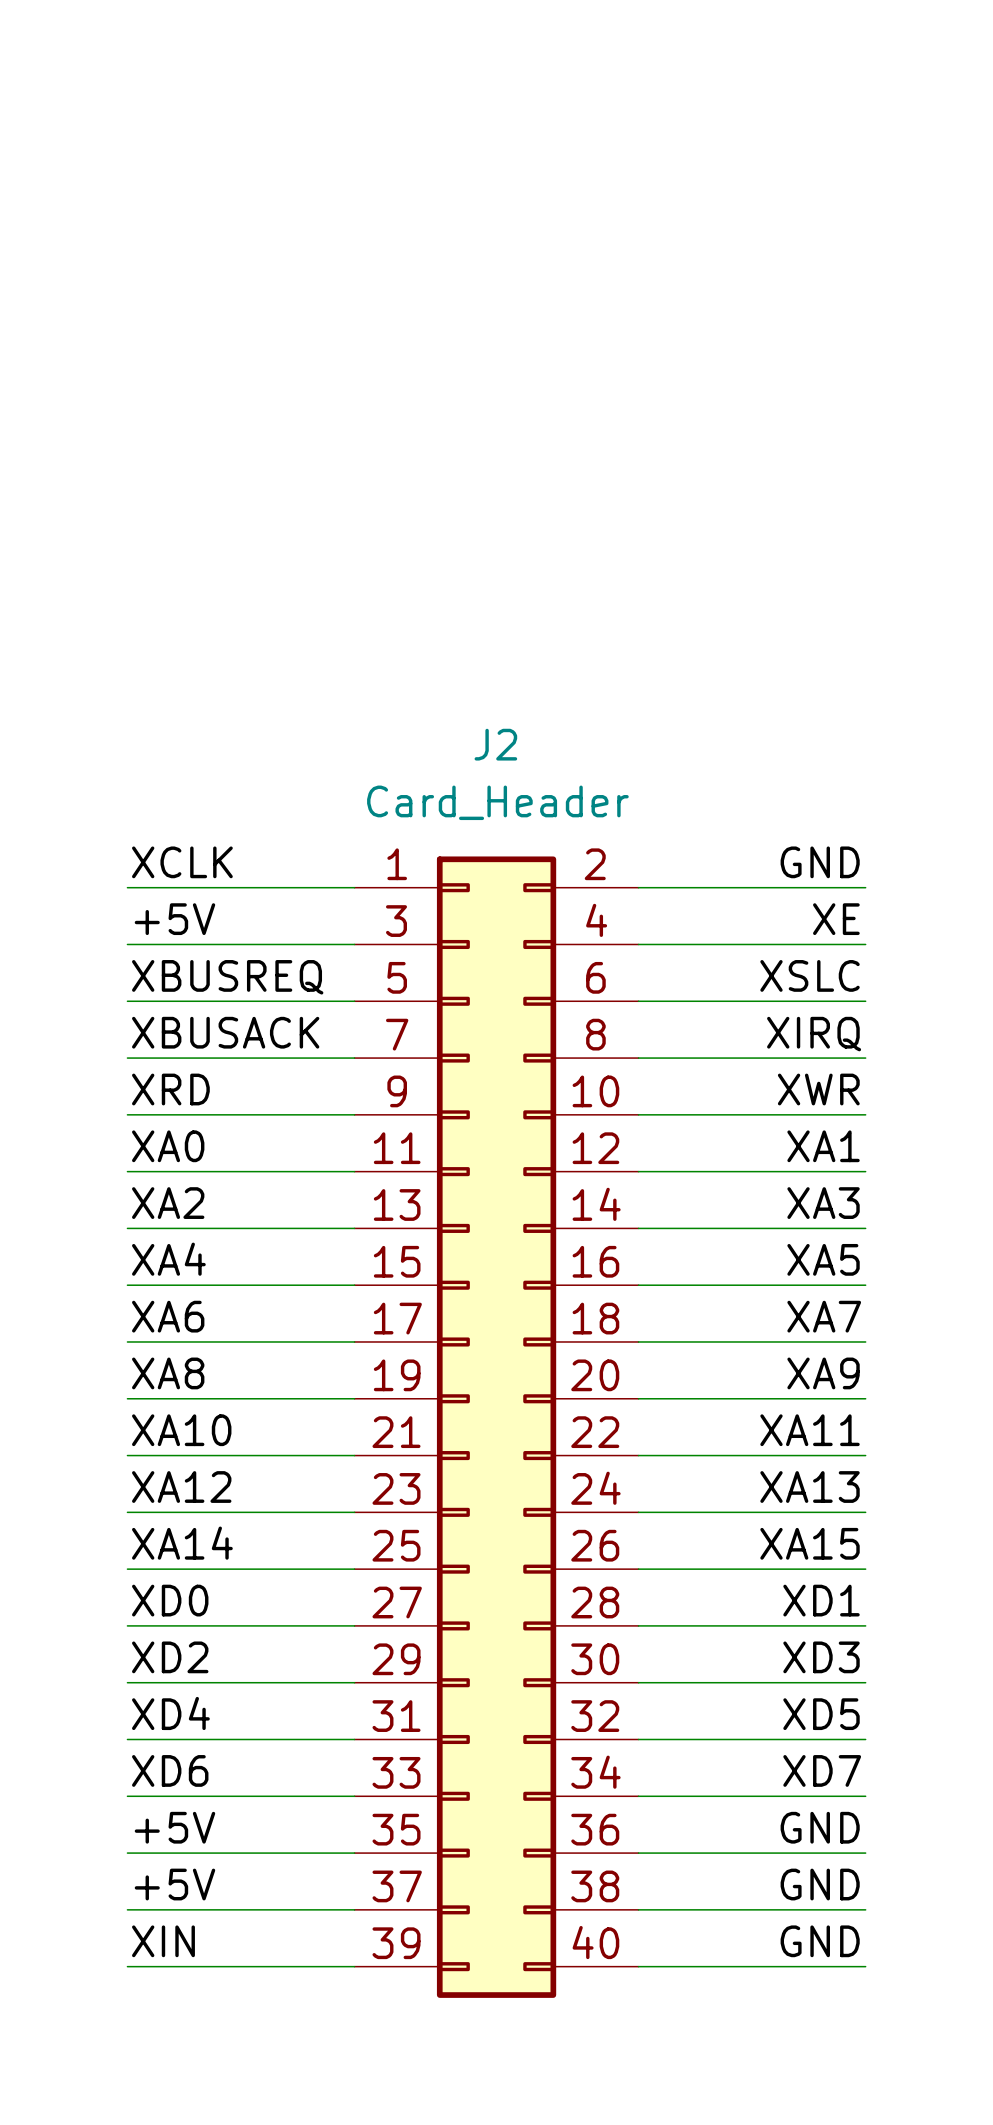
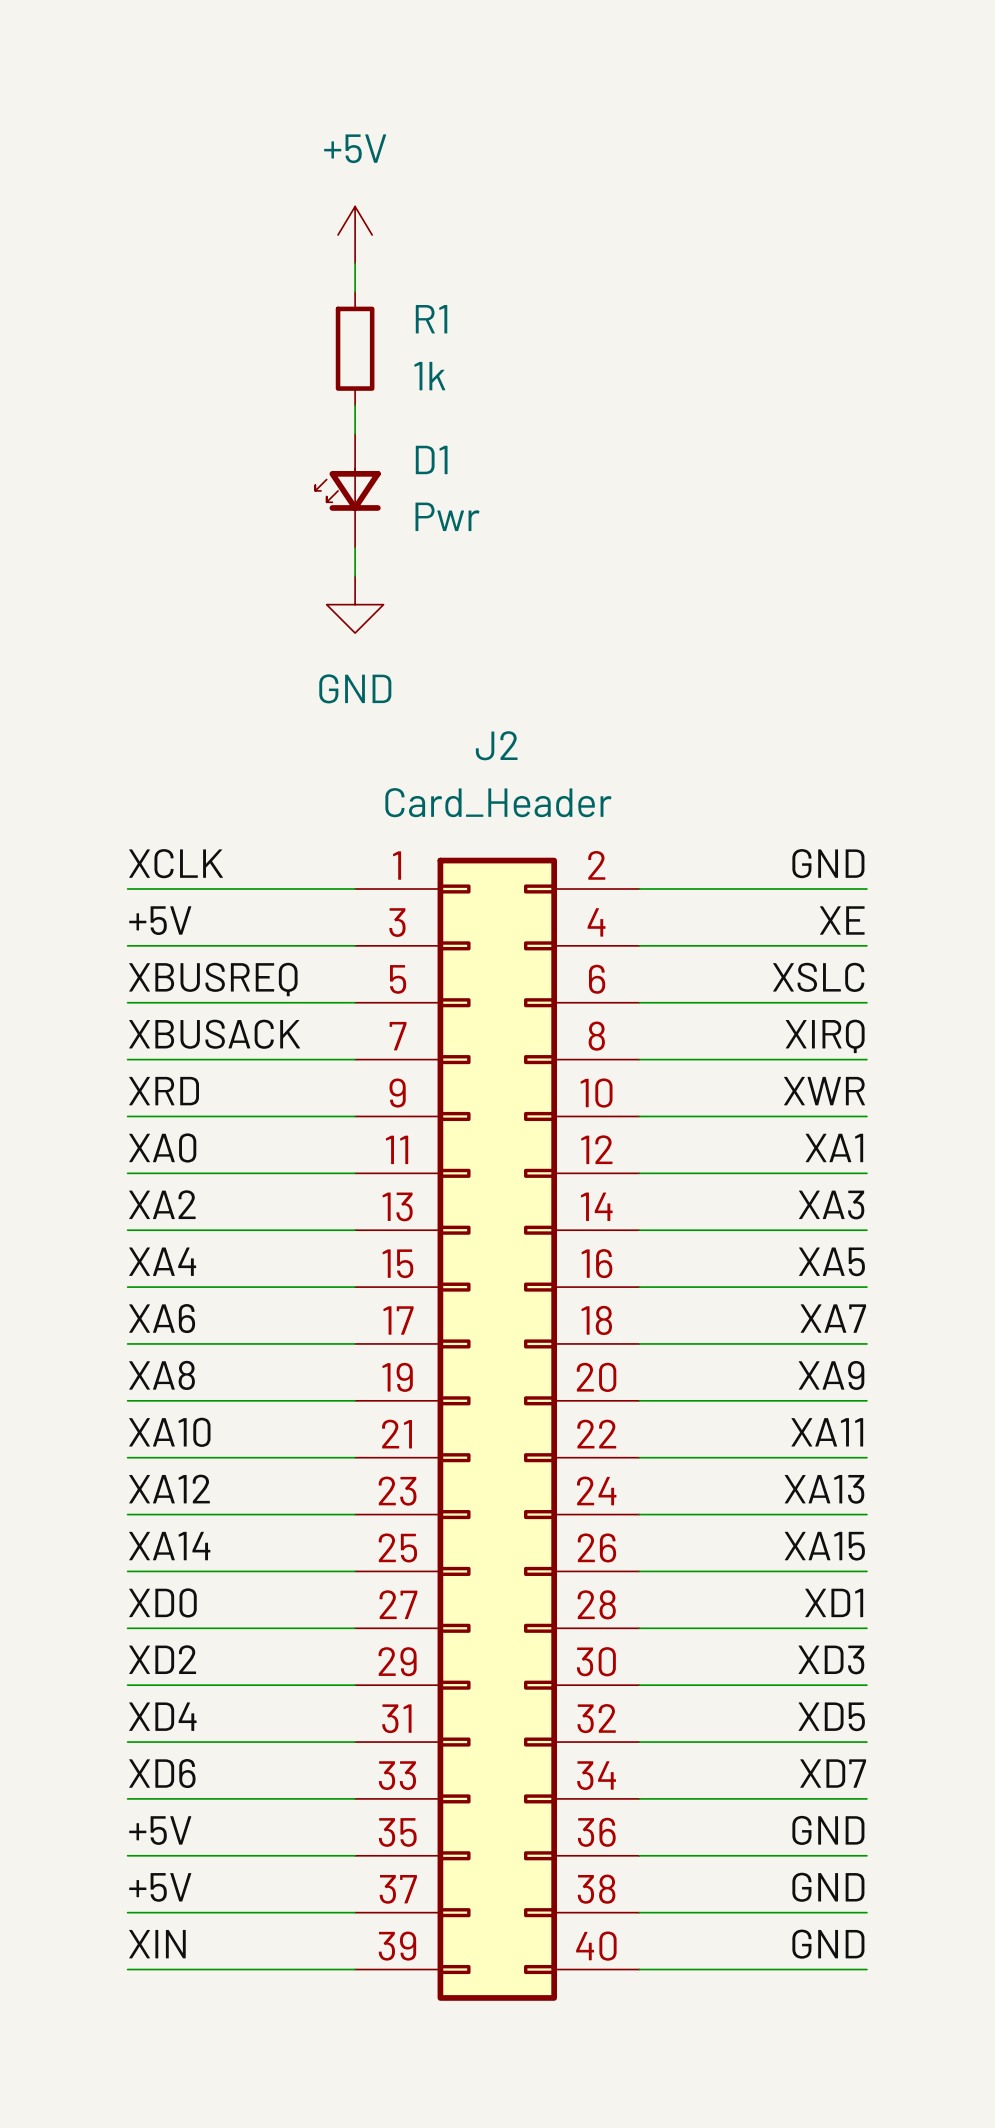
power symbol: none -> +5V (355, 234)
wire: none -> (355, 263) (355, 291)
R1: none -> 1k (355, 348)
wire: none -> (355, 405) (355, 434)
D1: none -> Pwr (347, 490)
wire: none -> (355, 547) (355, 576)
power symbol: none -> GND (355, 604)

